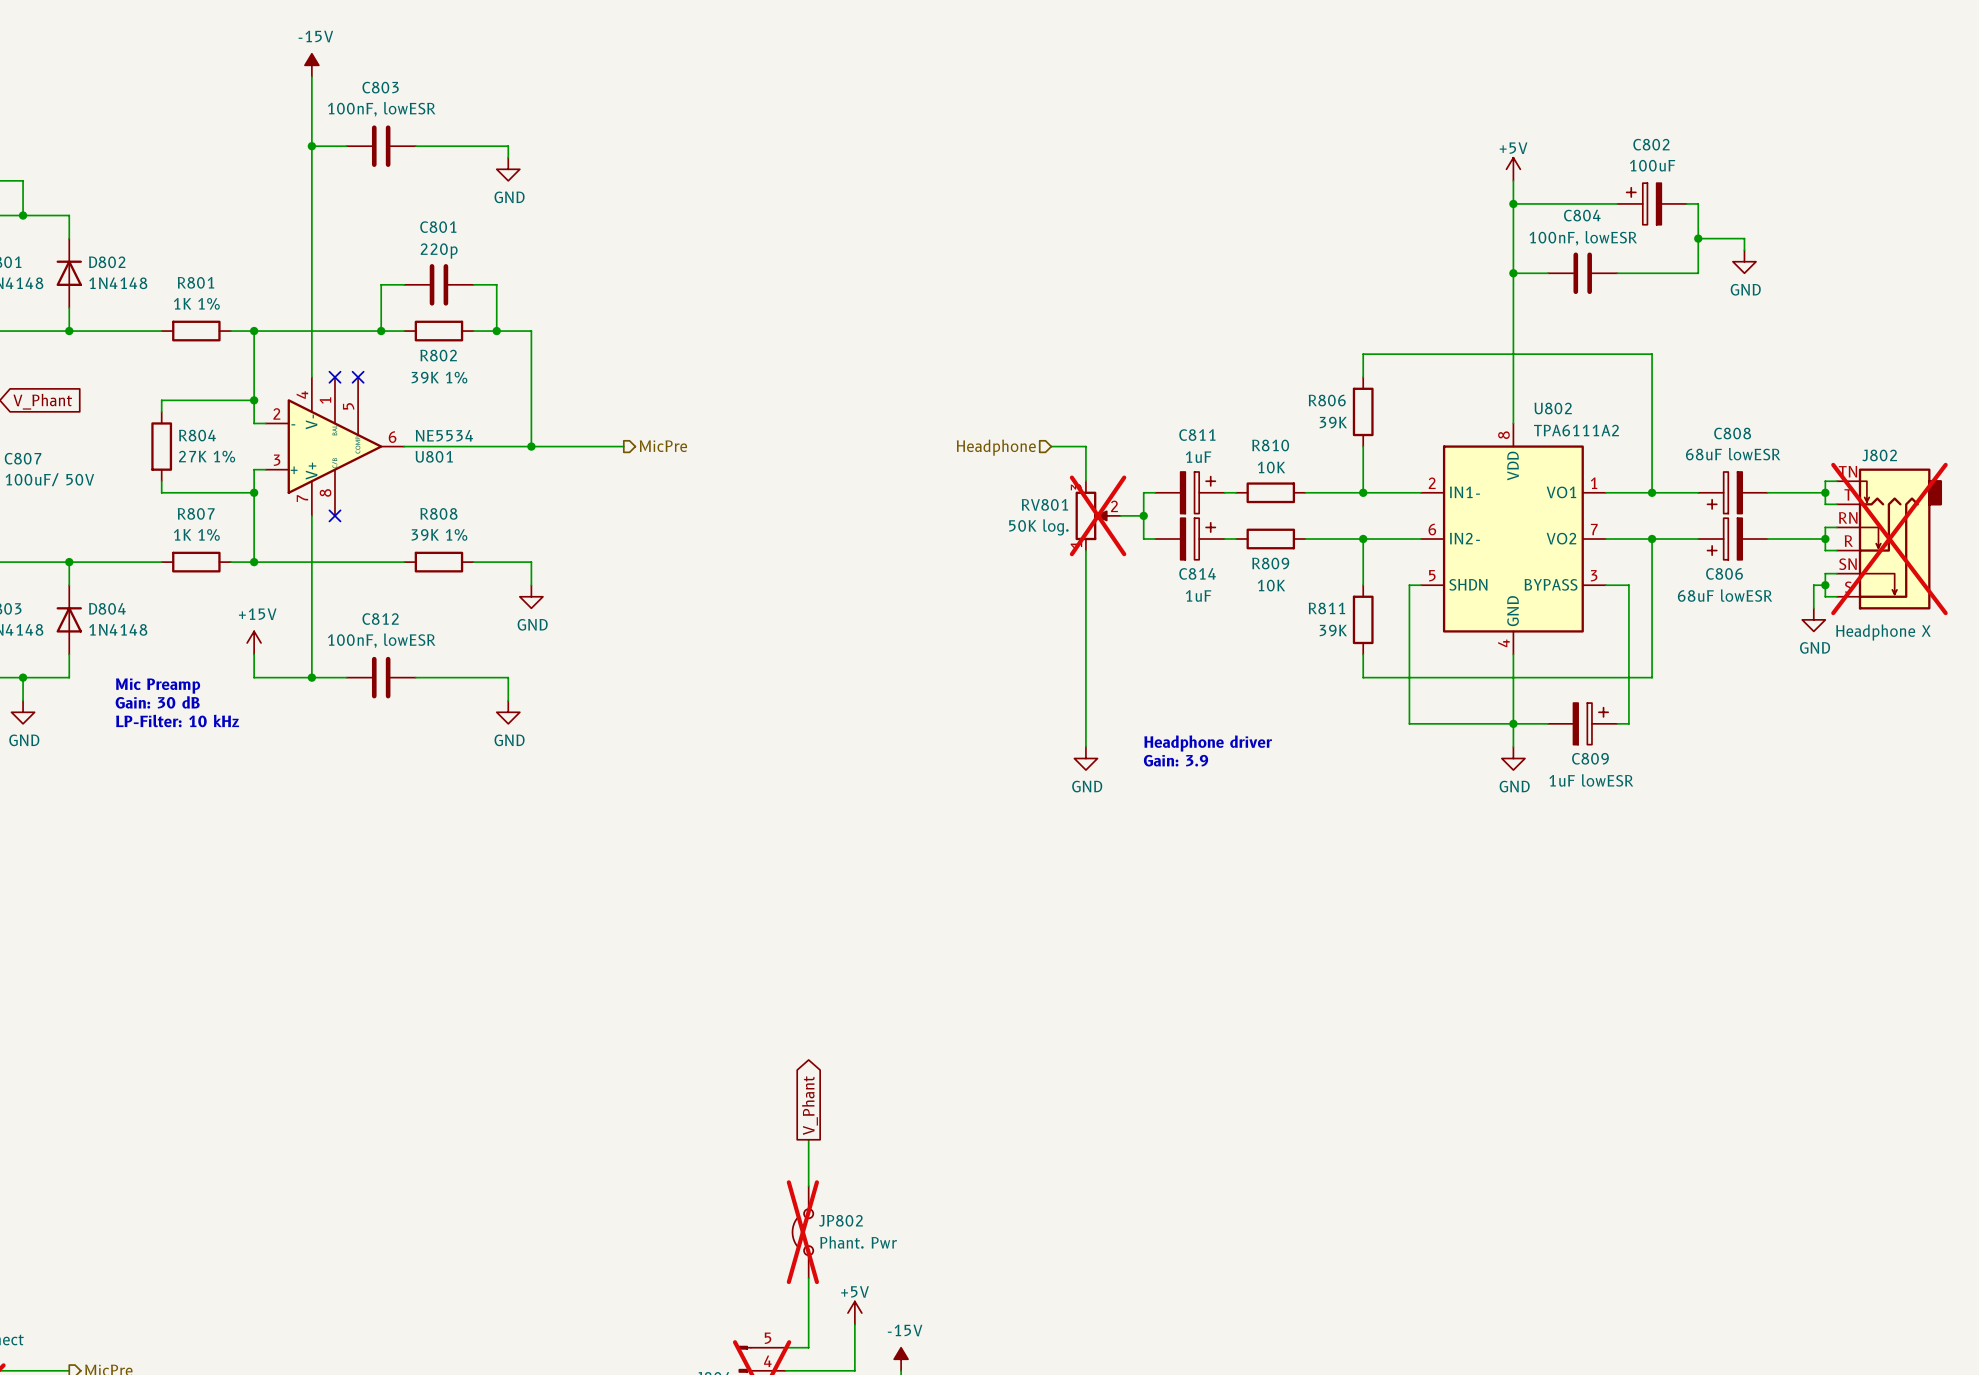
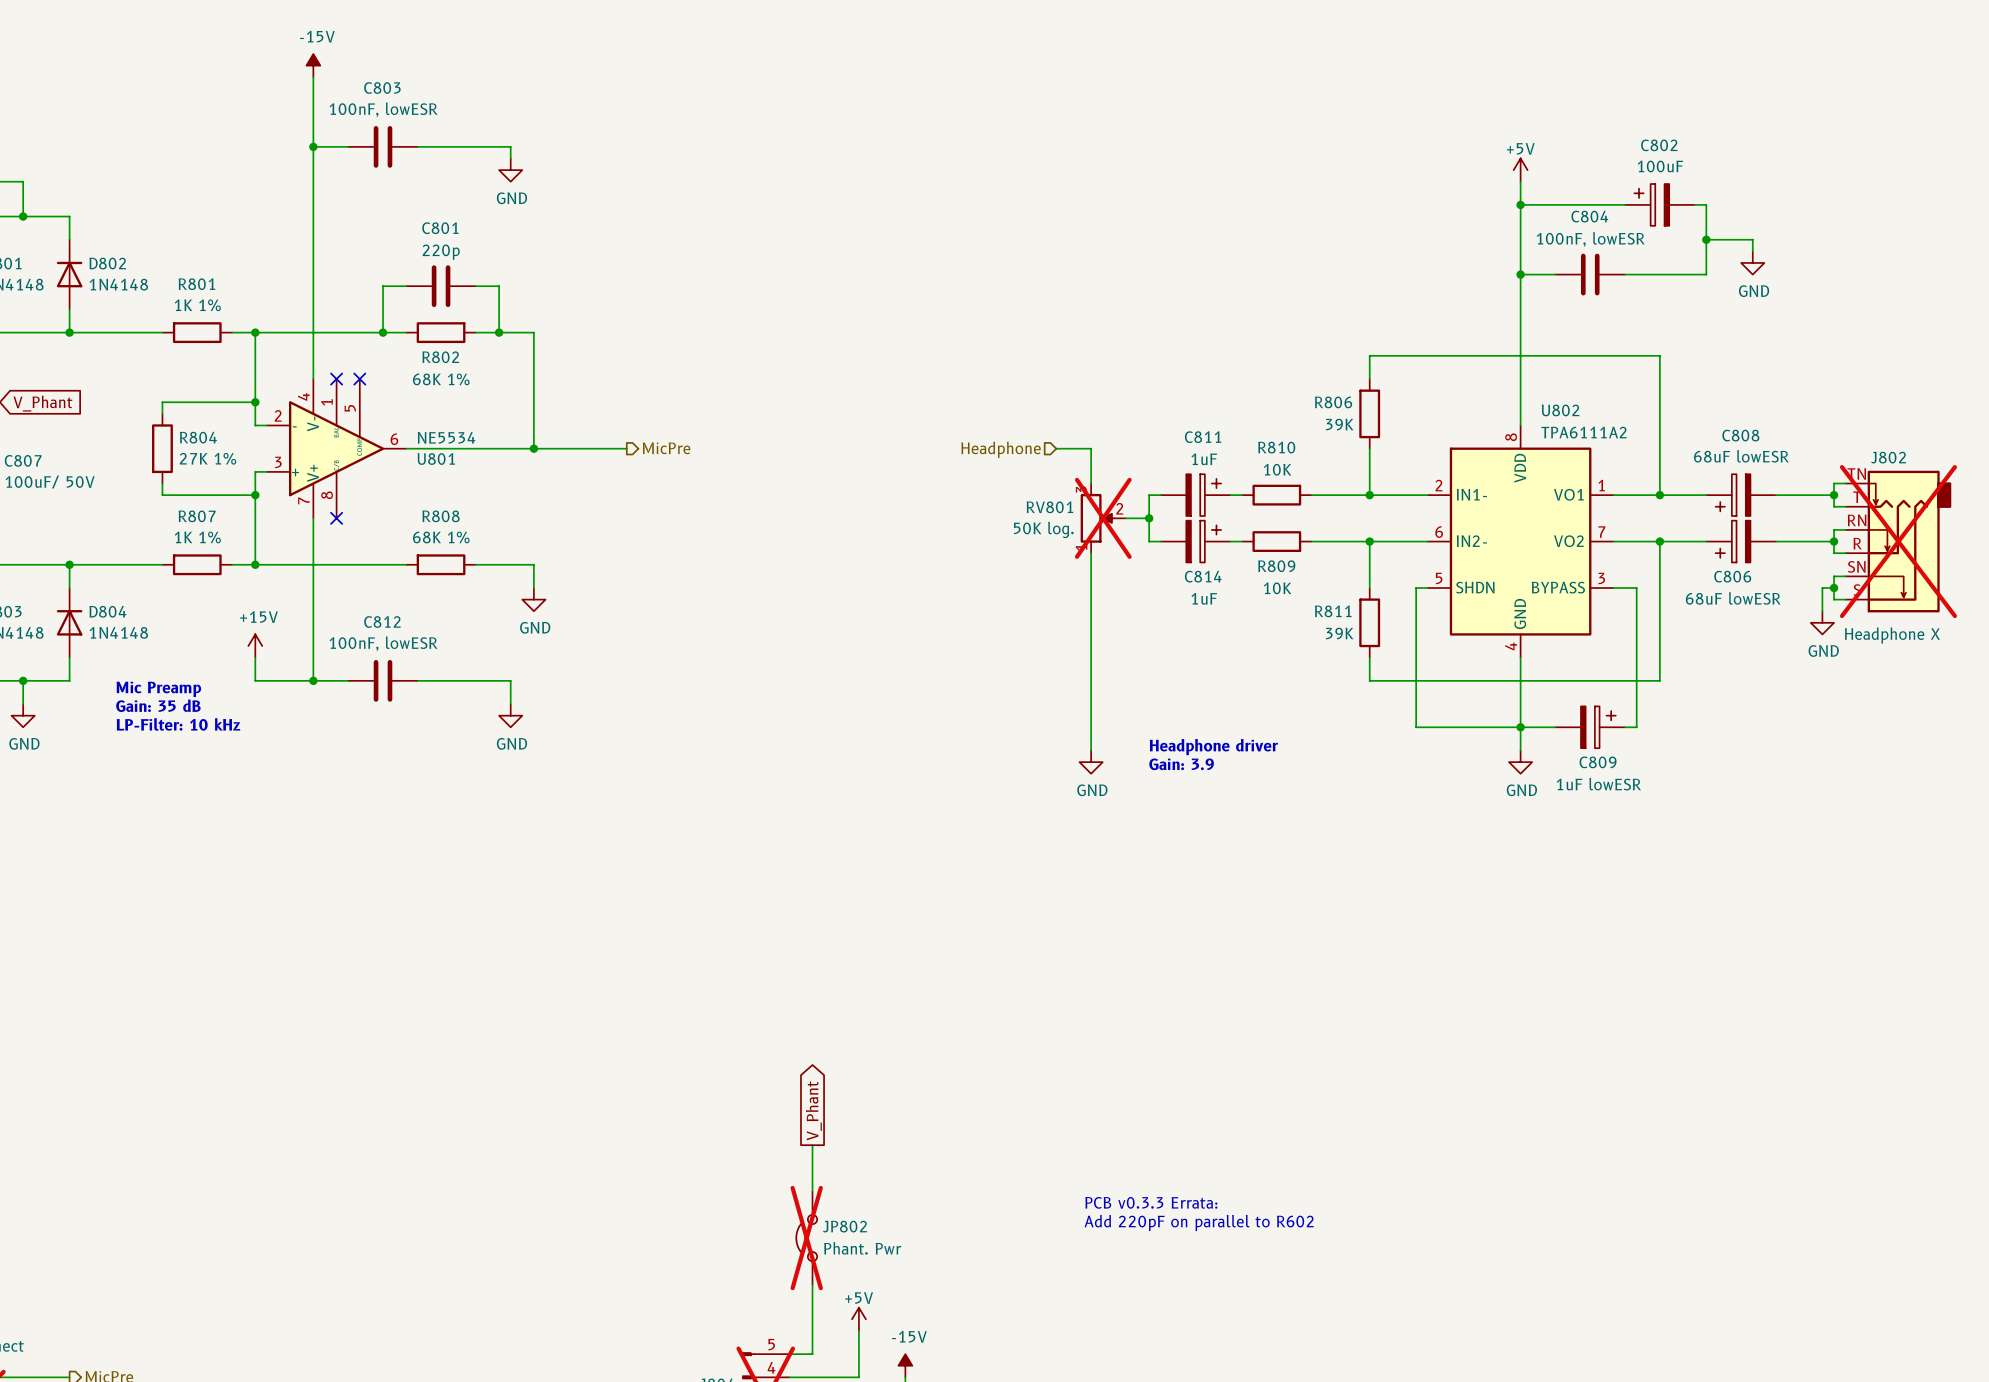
R802 value: 39K 1% (439, 377) -> 68K 1% (441, 379)
R808 value: 39K 1% (439, 534) -> 68K 1% (441, 537)
text: Gain: 30 dB (157, 702) -> Gain: 35 dB (158, 705)
text: none -> PCB v0.3.3 Errata: (1151, 1202)
text: none -> Add 220pF on parallel to R602 (1199, 1222)

